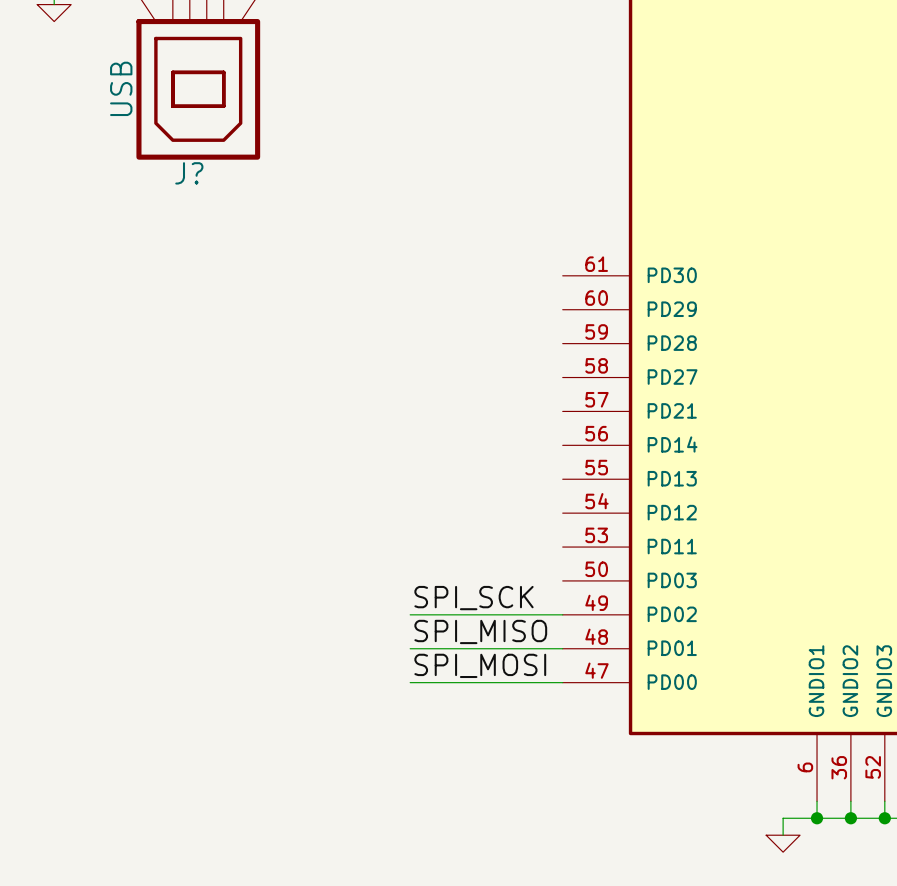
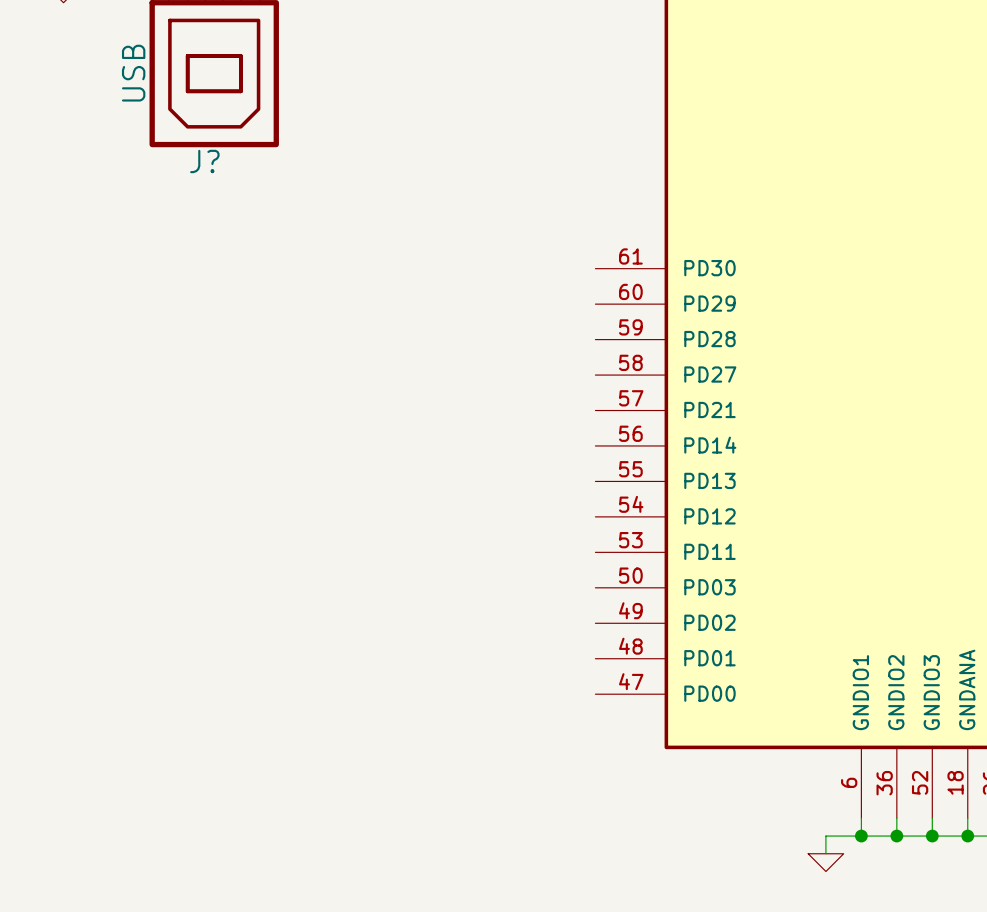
label: SPI_SCK (473, 598) -> none
wire: (410, 614) (562, 614) -> none
label: SPI_MISO (480, 631) -> none
wire: (410, 648) (562, 648) -> none
label: SPI_MOSI (480, 665) -> none
wire: (410, 682) (562, 682) -> none

